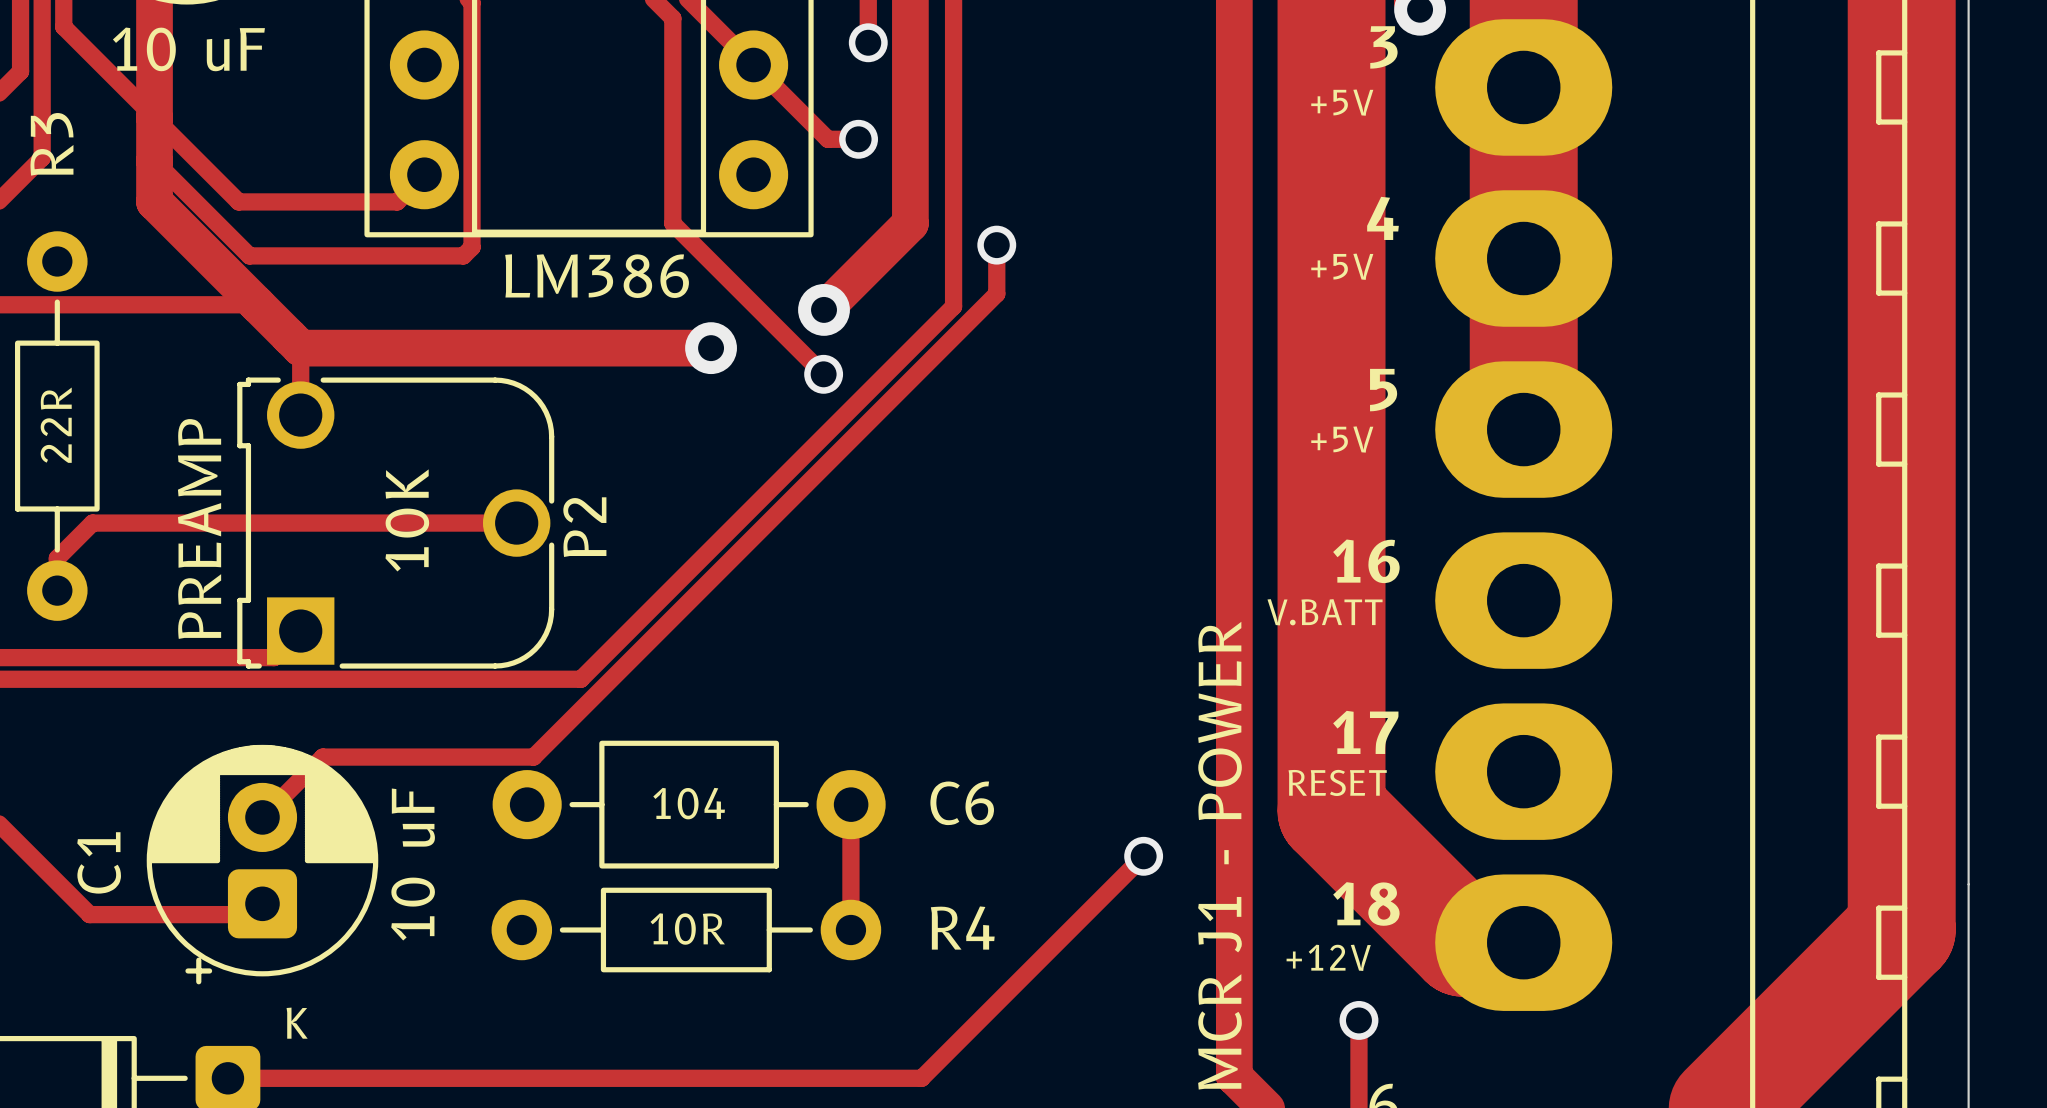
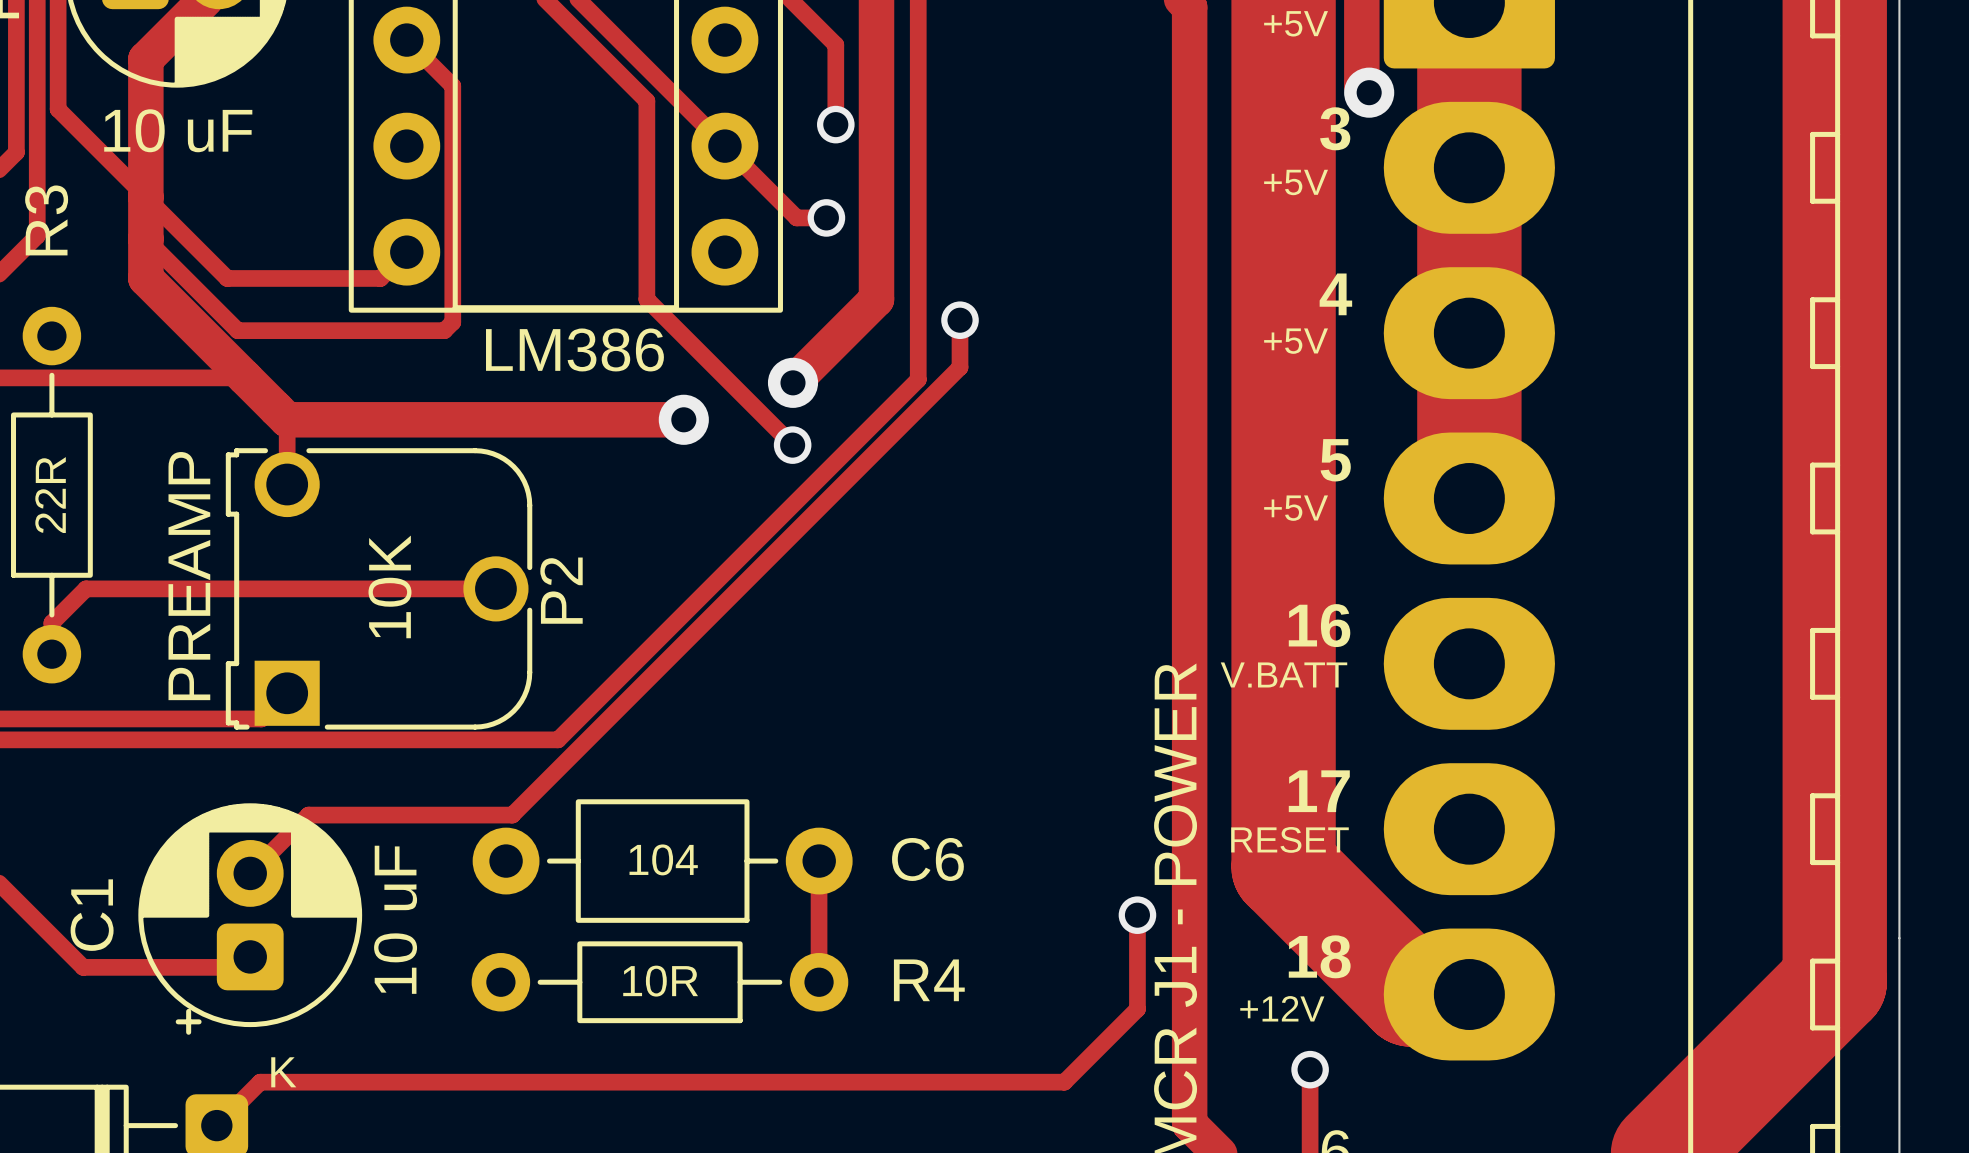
track: (1143, 856) (921, 1078) (227, 1078) -> (1137, 915) (1137, 1009) (1064, 1082) (260, 1082) (216, 1125)
via position: (1143, 856) -> (1137, 915)

